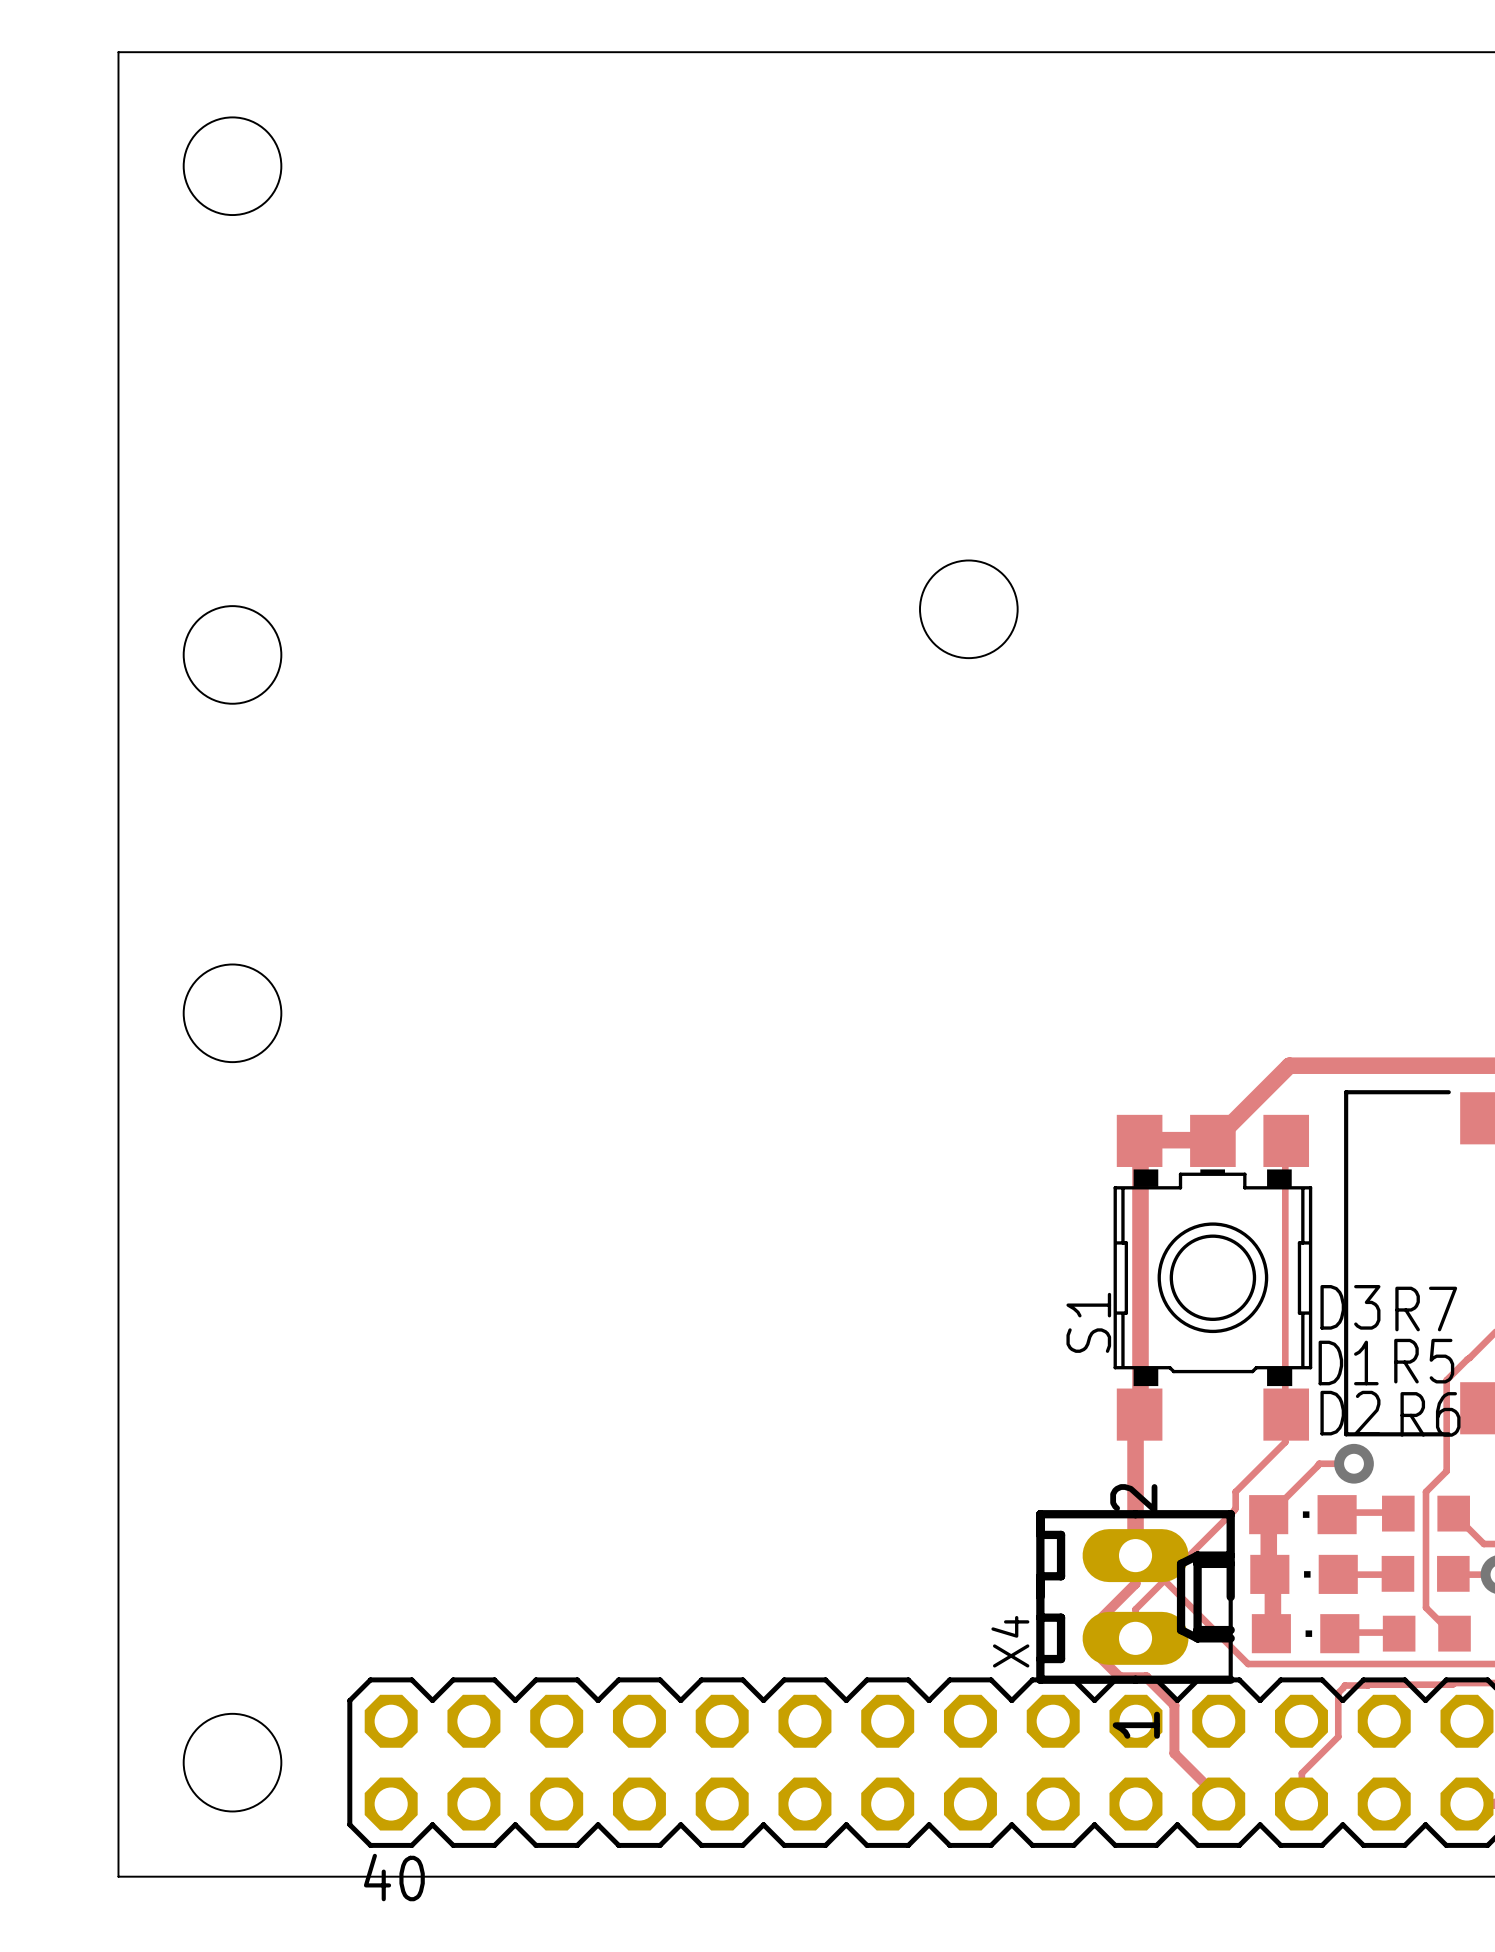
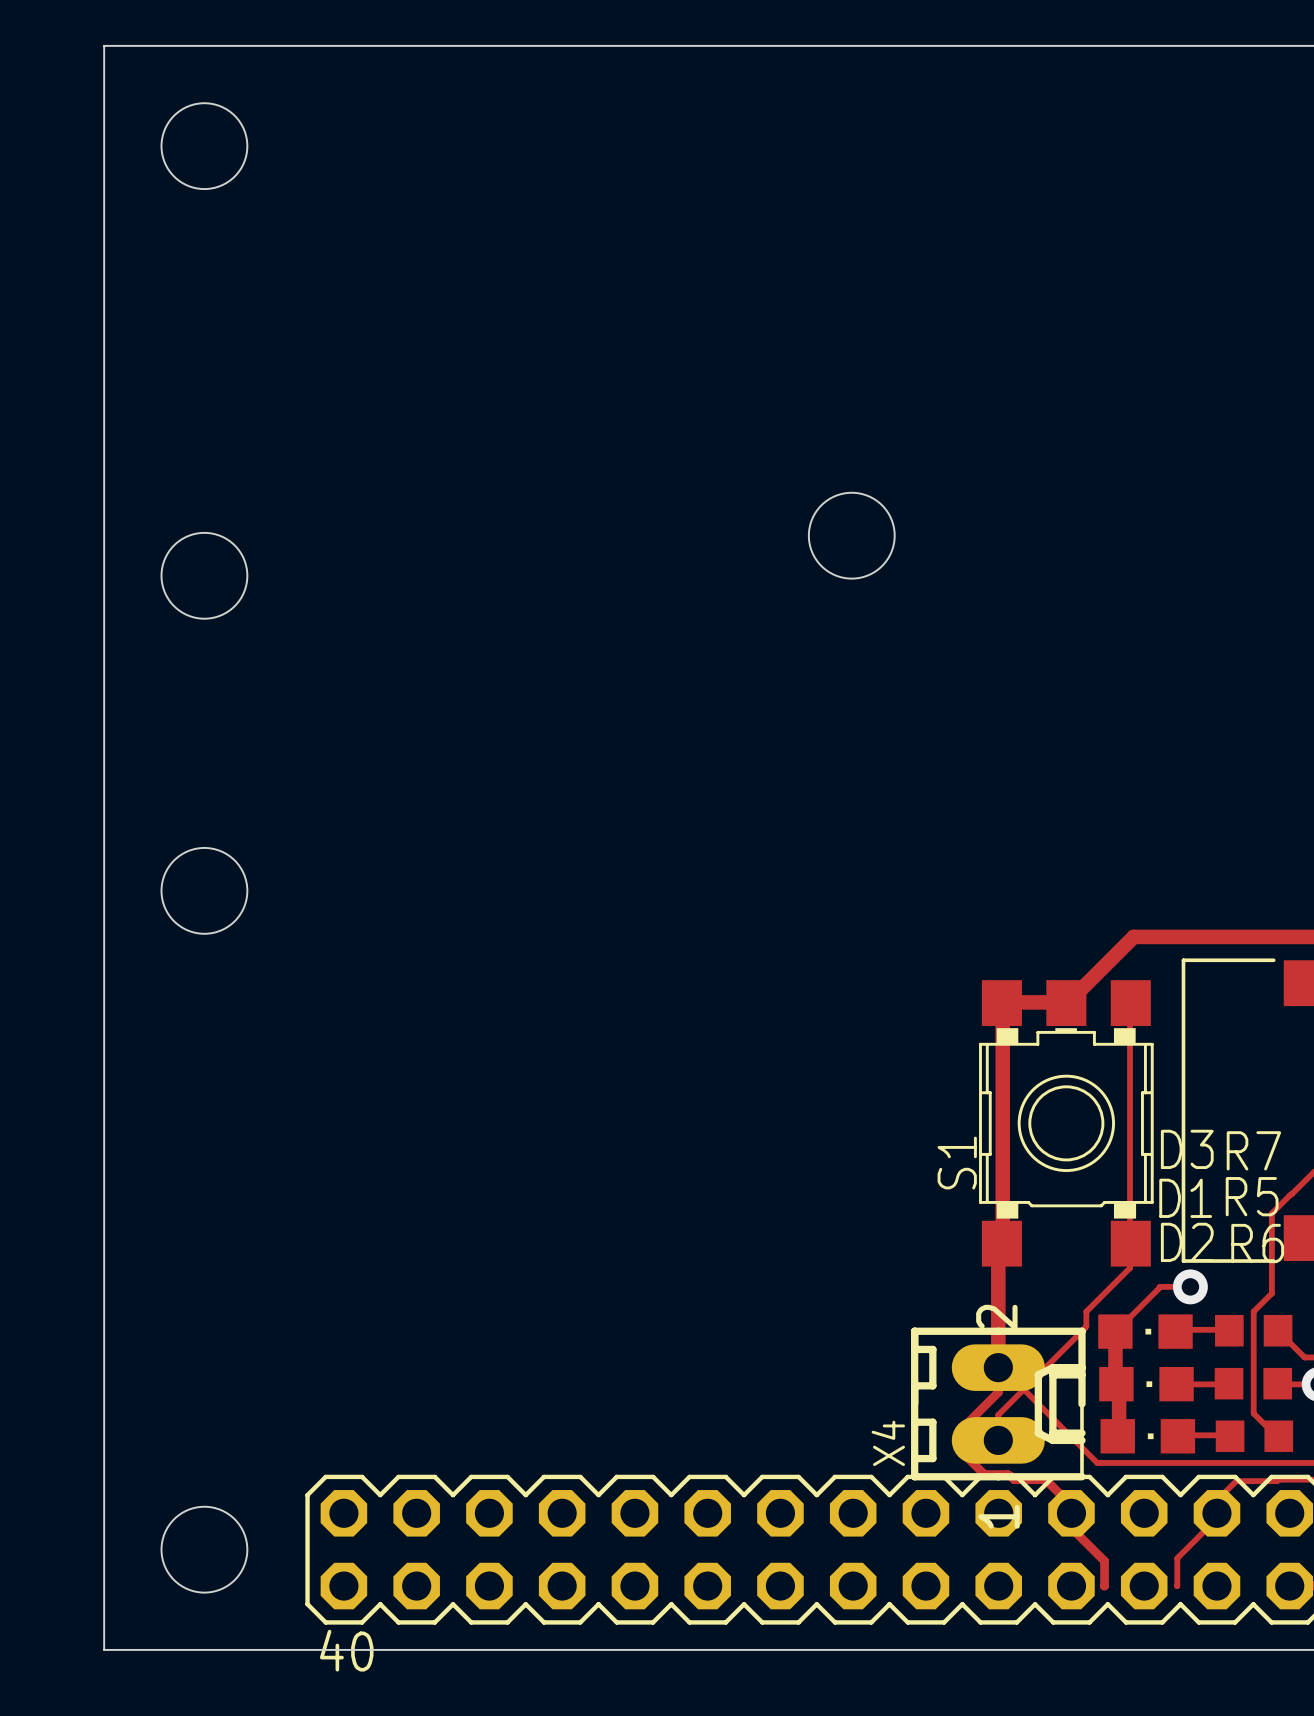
track: (1146, 1677) (1174, 1705) (1174, 1753) (1218, 1797) (1218, 1804) (1219, 1802) -> (1007, 1474) (1014, 1479) (1045, 1479) (1070, 1504) (1070, 1526) (1104, 1561) (1104, 1585)
track: (1406, 1684) (1344, 1685) (1338, 1692) (1338, 1736) (1301, 1773) (1301, 1803) -> (1236, 1481) (1209, 1508) (1209, 1526) (1177, 1558) (1177, 1585)

